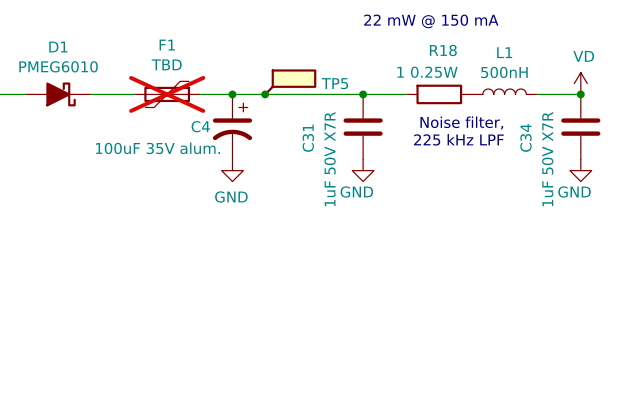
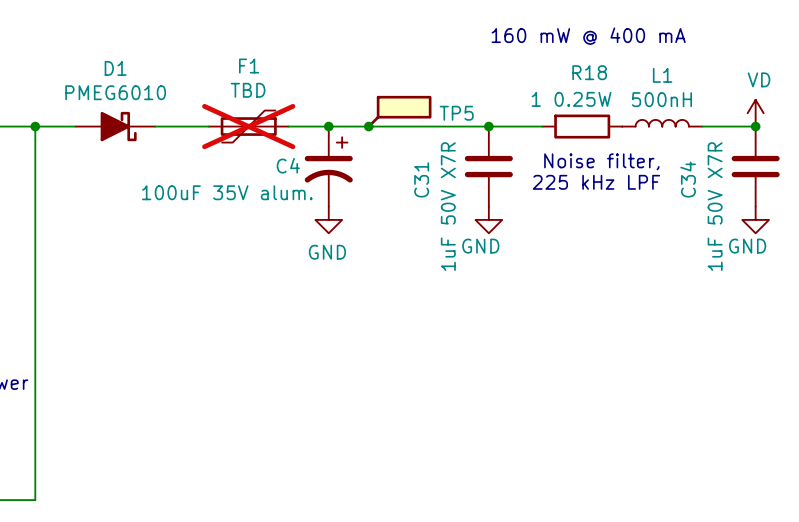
text: 22 mW @ 150 mA (431, 21) -> 160 mW @ 400 mA (588, 36)

